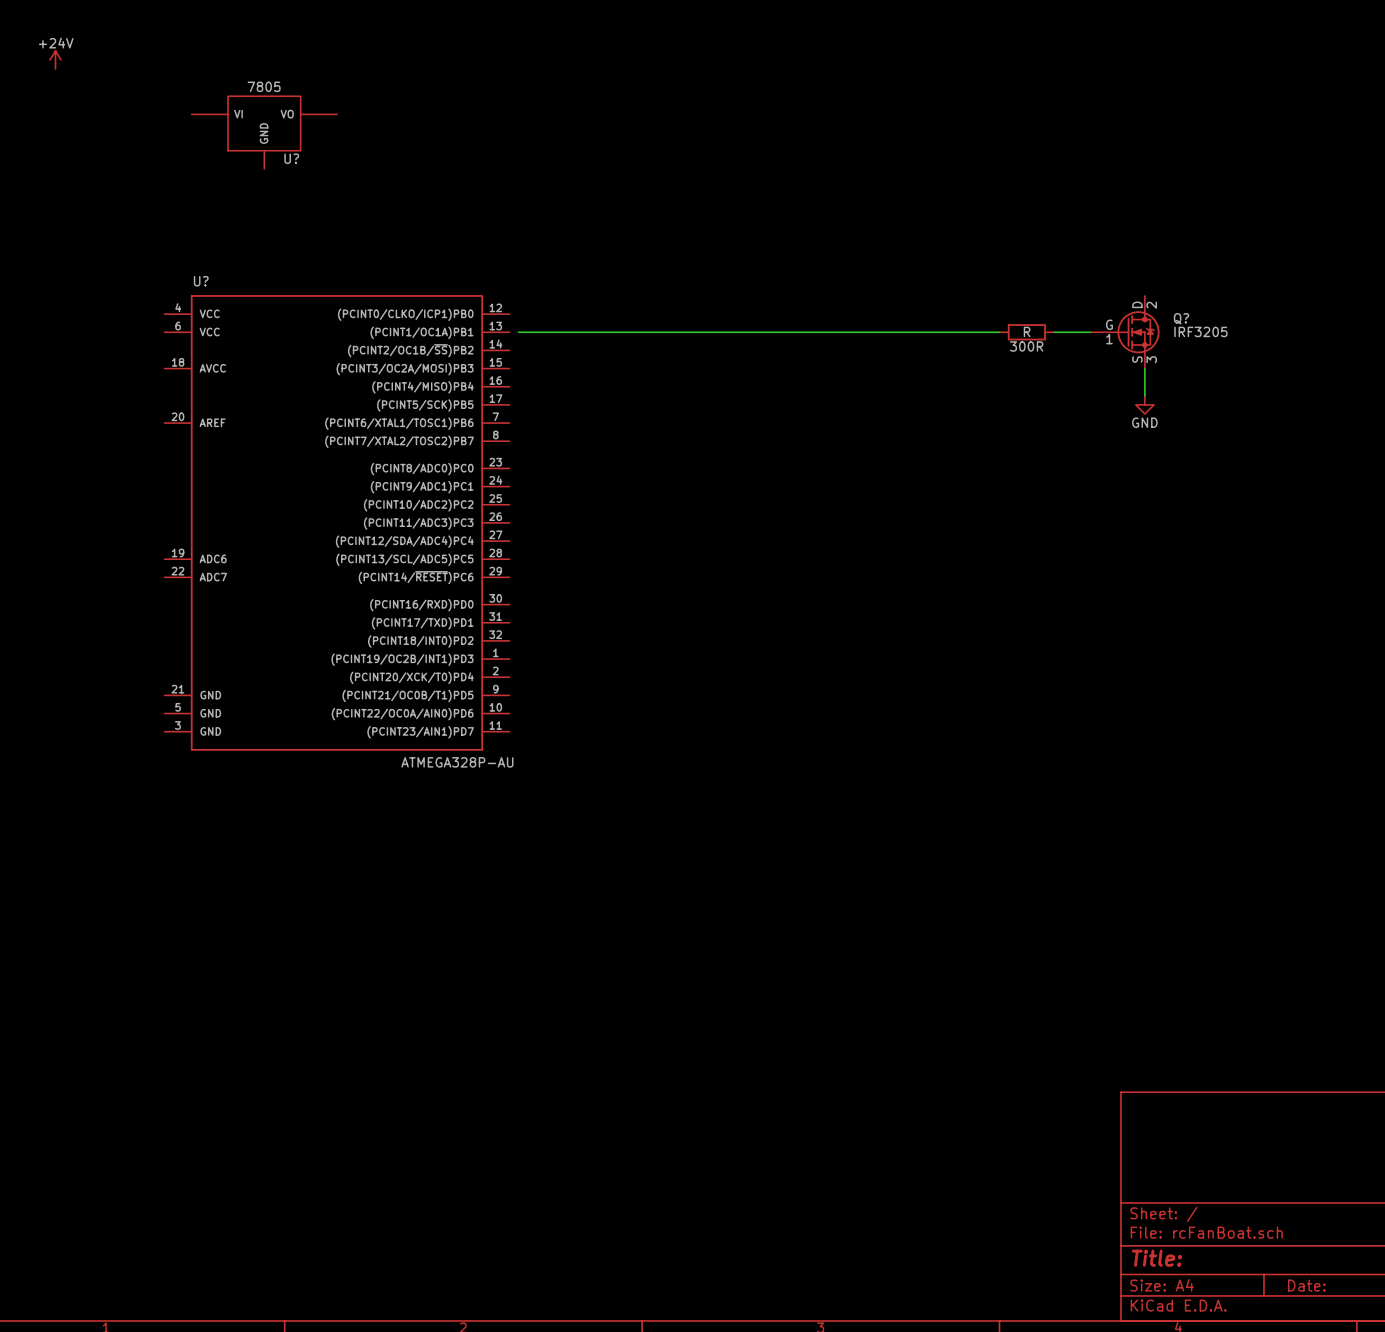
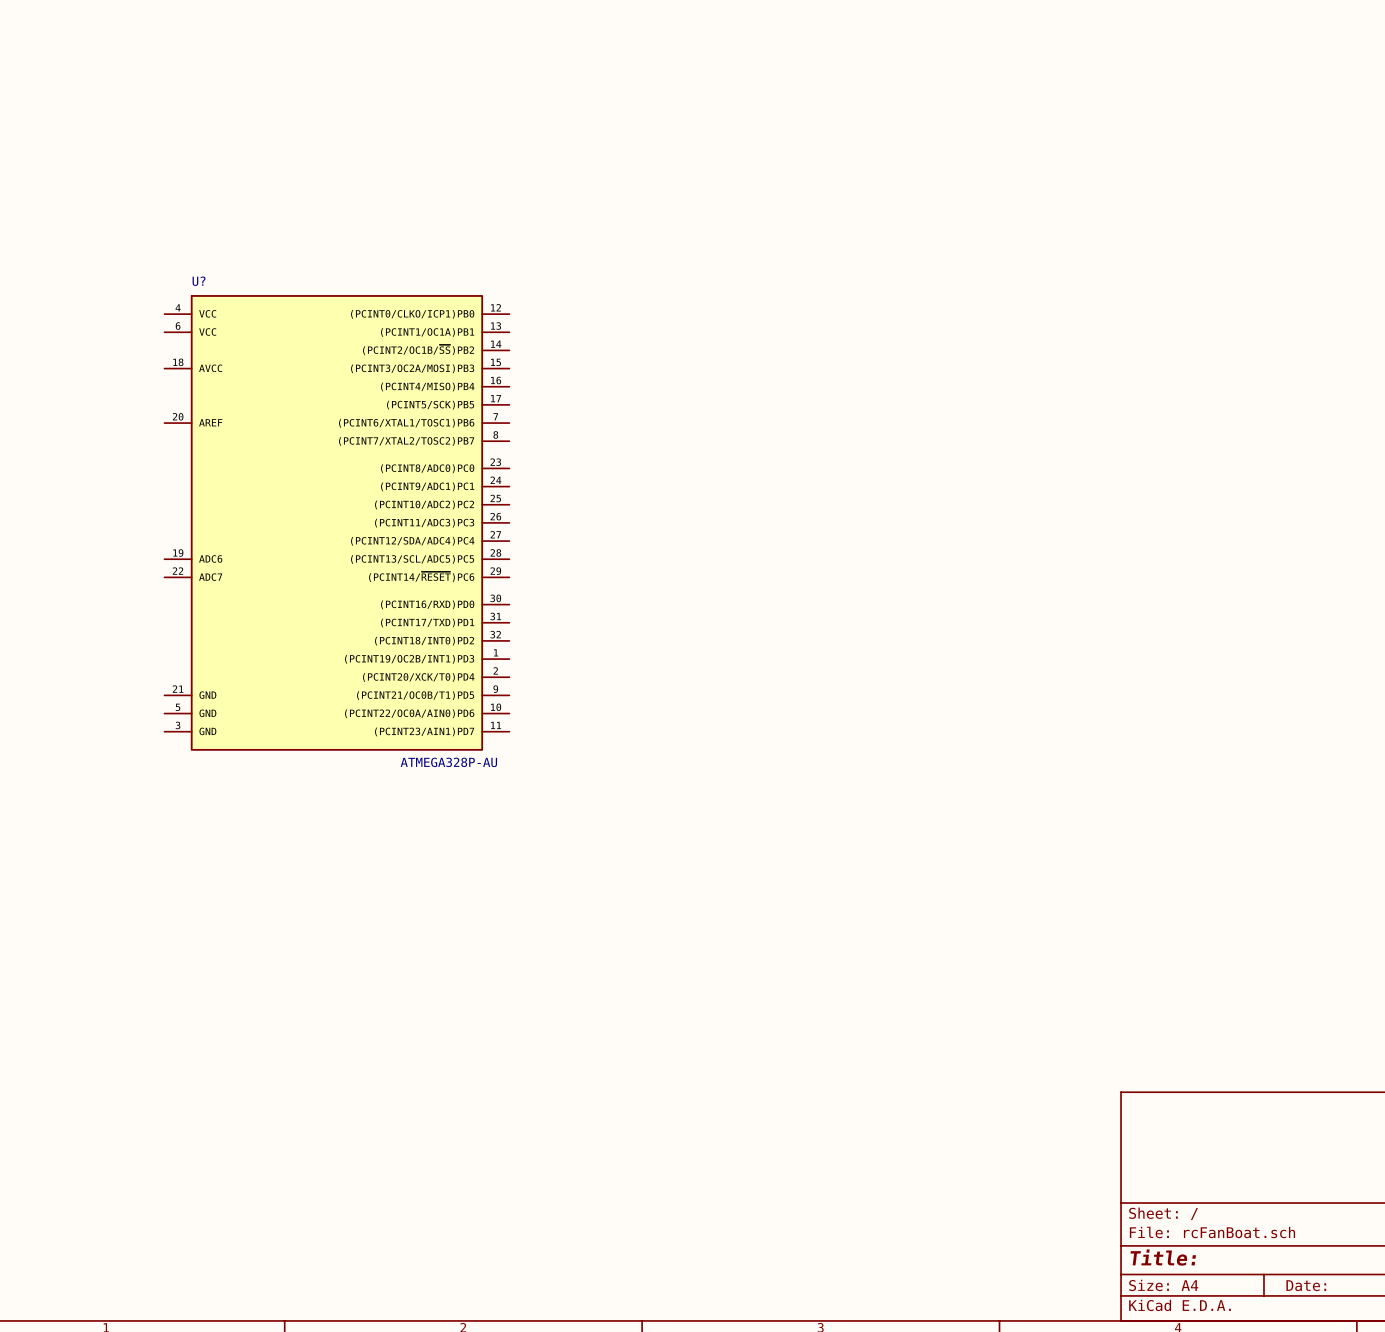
power symbol: +24V (55, 59) -> none
U?: 7805 (264, 132) -> none
wire: (518, 332) (999, 332) -> none
300R: R (1026, 332) -> none
wire: (1054, 332) (1090, 332) -> none
Q?: IRF3205 (1125, 332) -> none
wire: (1144, 368) (1144, 395) -> none
power symbol: GND (1144, 404) -> none

